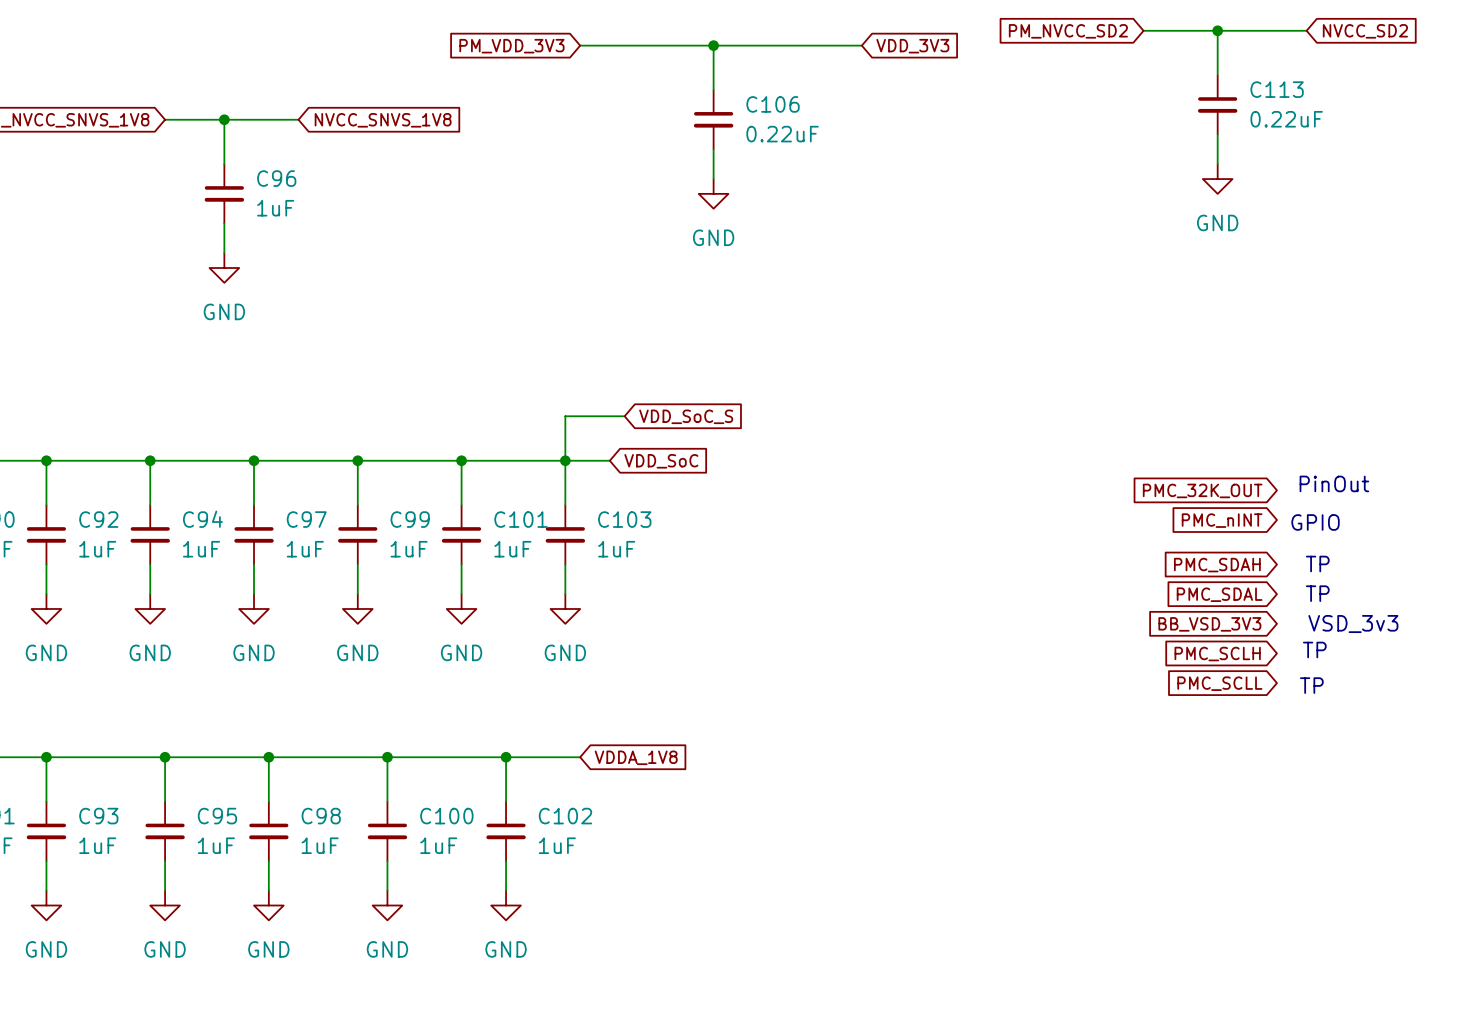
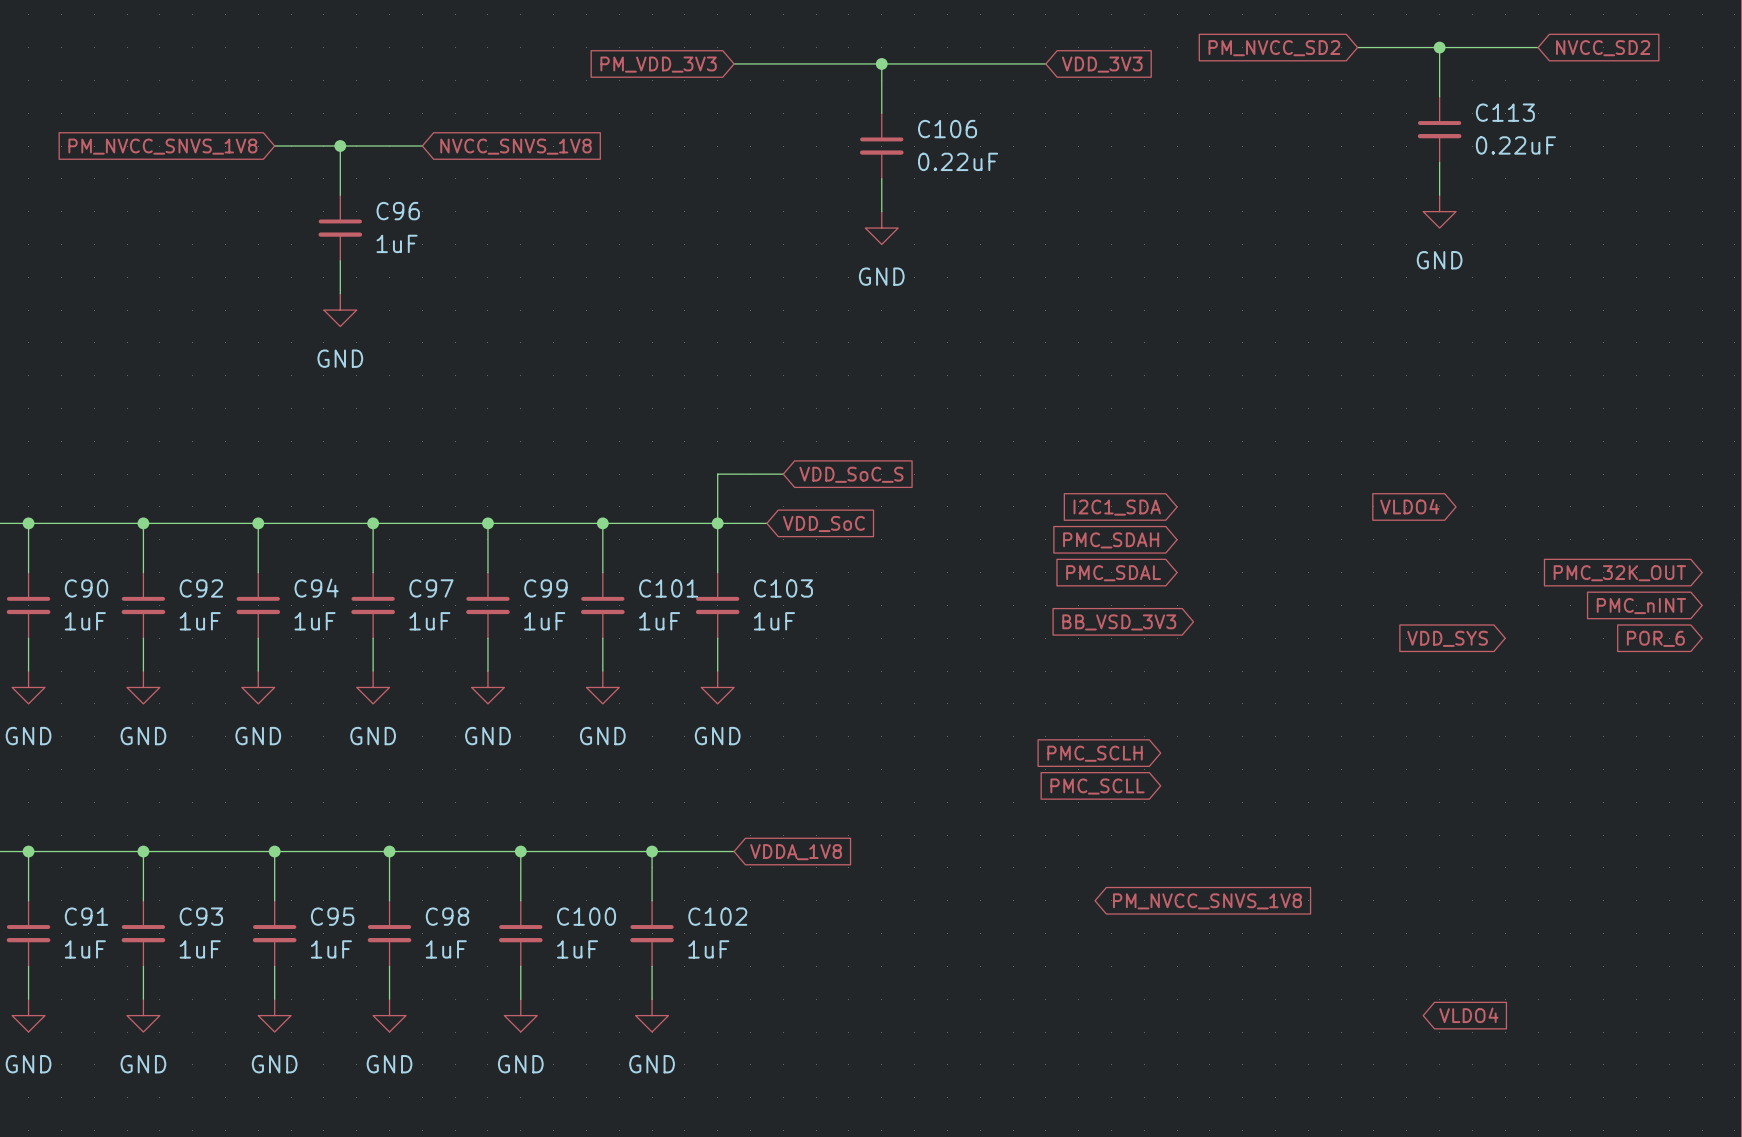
global label: none -> VLDO4 (1409, 506)
global label: none -> I2C1_SDA (1117, 507)
global label: none -> PMC_SDAH (1111, 540)
text: PinOut (1334, 483) -> none
global label position: PMC_32K_OUT (1202, 490) -> PMC_32K_OUT (1619, 573)
global label: none -> PMC_SDAL (1113, 573)
global label position: PMC_nINT (1222, 520) -> PMC_nINT (1641, 606)
text: GPIO (1315, 522) -> none
text: TP (1317, 564) -> none
global label: PMC_SDAH (1217, 565) -> VDD_SYS (1447, 638)
global label: none -> POR_6 (1655, 638)
text: TP (1317, 593) -> none
global label: PMC_SDAL (1219, 594) -> none
global label position: BB_VSD_3V3 (1209, 624) -> BB_VSD_3V3 (1119, 622)
text: VSD_3v3 (1353, 624) -> none
text: TP (1314, 650) -> none
global label: PMC_SCLH (1217, 654) -> none
global label: none -> PMC_SCLH (1095, 753)
global label: PMC_SCLL (1219, 683) -> none
text: TP (1311, 685) -> none
global label: none -> PMC_SCLL (1097, 786)
global label: none -> PM_NVCC_SNVS_1V8 (1207, 901)
global label: none -> VLDO4 (1468, 1015)

